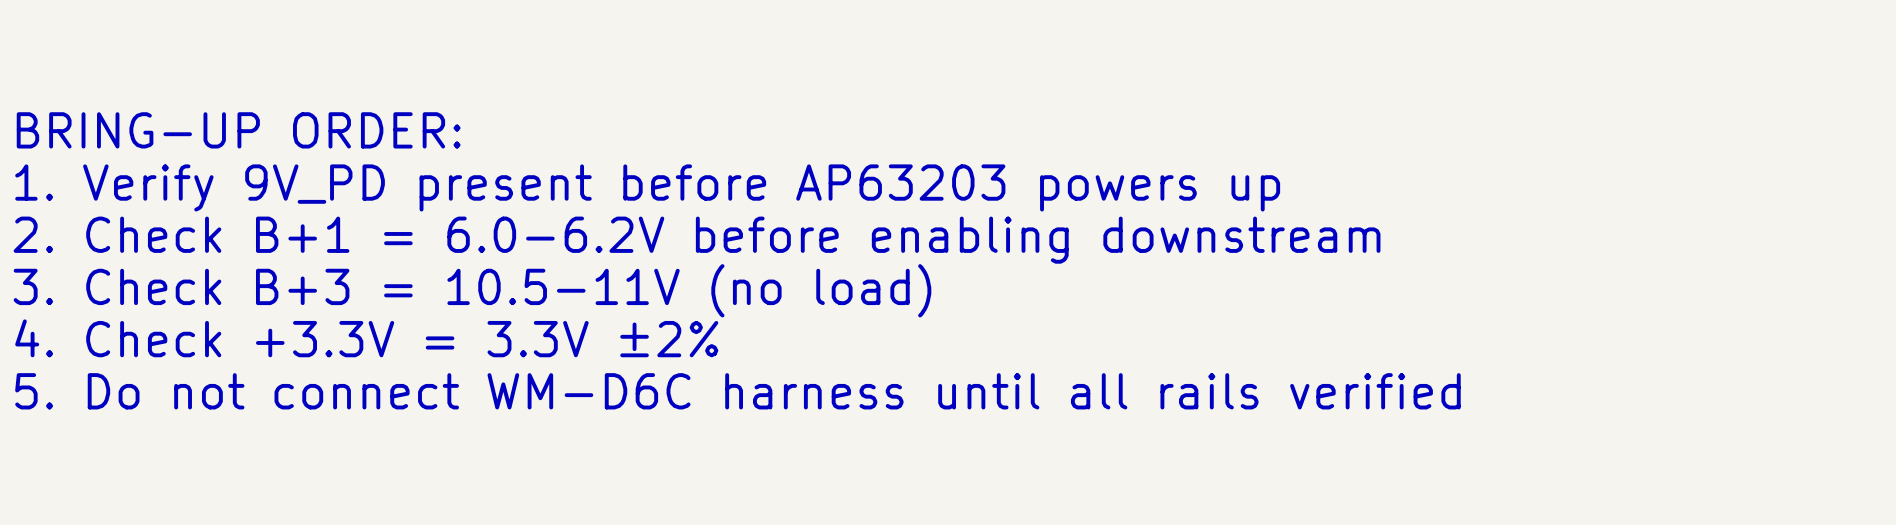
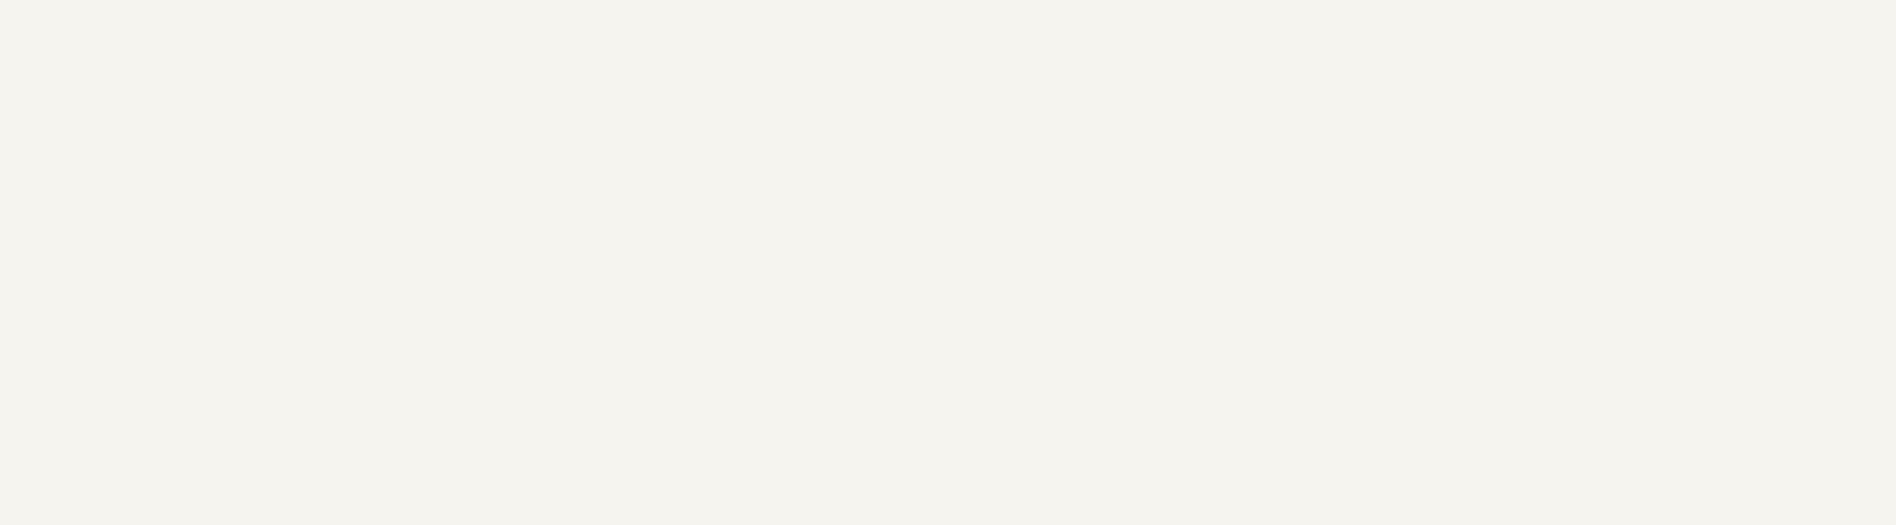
text: BRING-UP ORDER: (238, 130) -> none
text: 1. Verify 9V_PD present before AP63203 powers up (647, 187) -> none
text: 2. Check B+1 = 6.0-6.2V before enabling downstream (697, 240) -> none
text: 3. Check B+3 = 10.5-11V (no load) (472, 290) -> none
text: 4. Check +3.3V = 3.3V ±2% (366, 338) -> none
text: 5. Do not connect WM-D6C harness until all rails verified (737, 391) -> none

